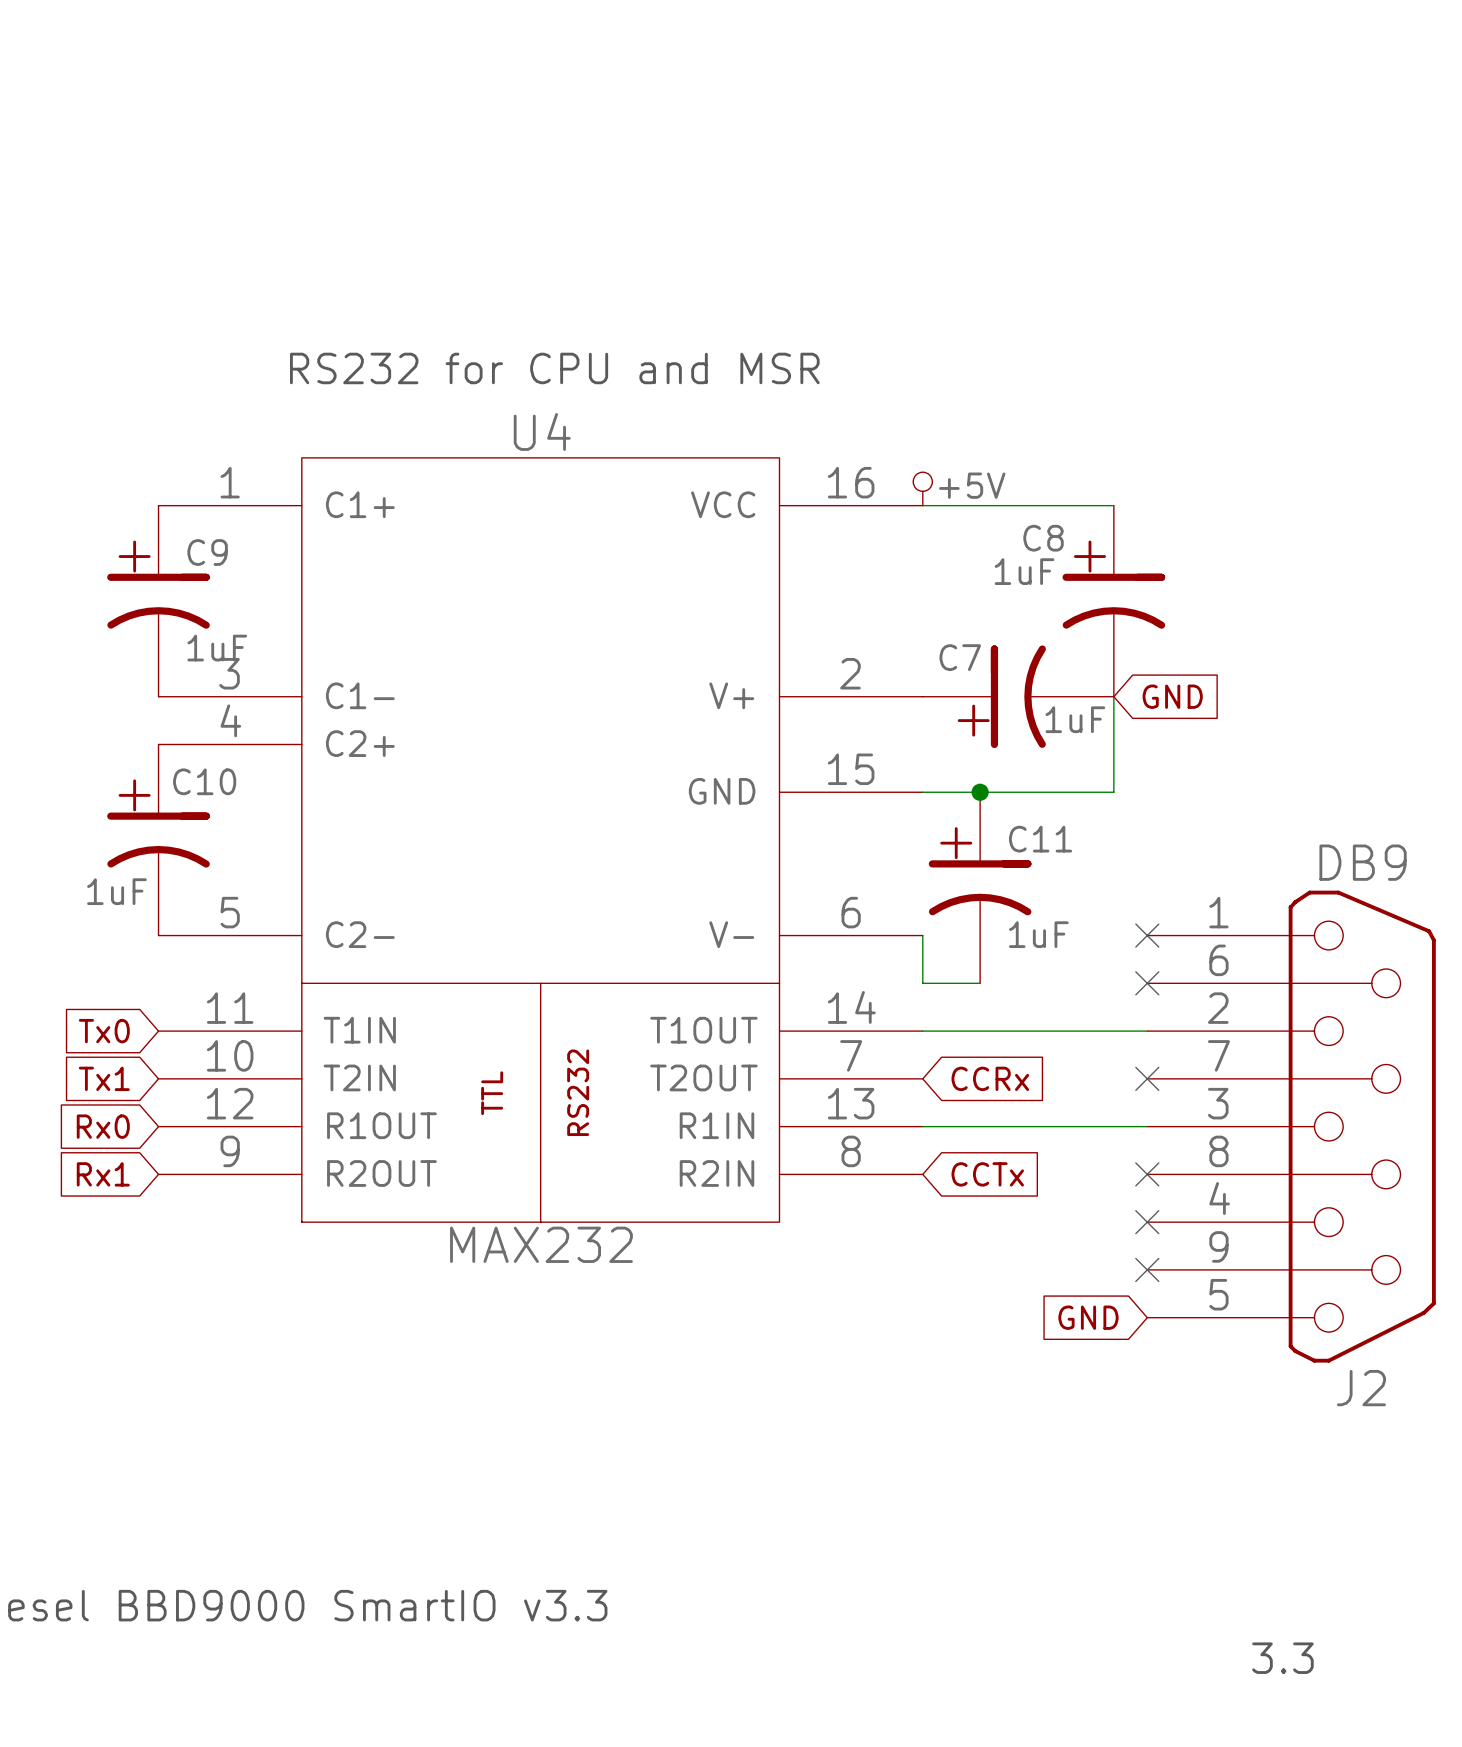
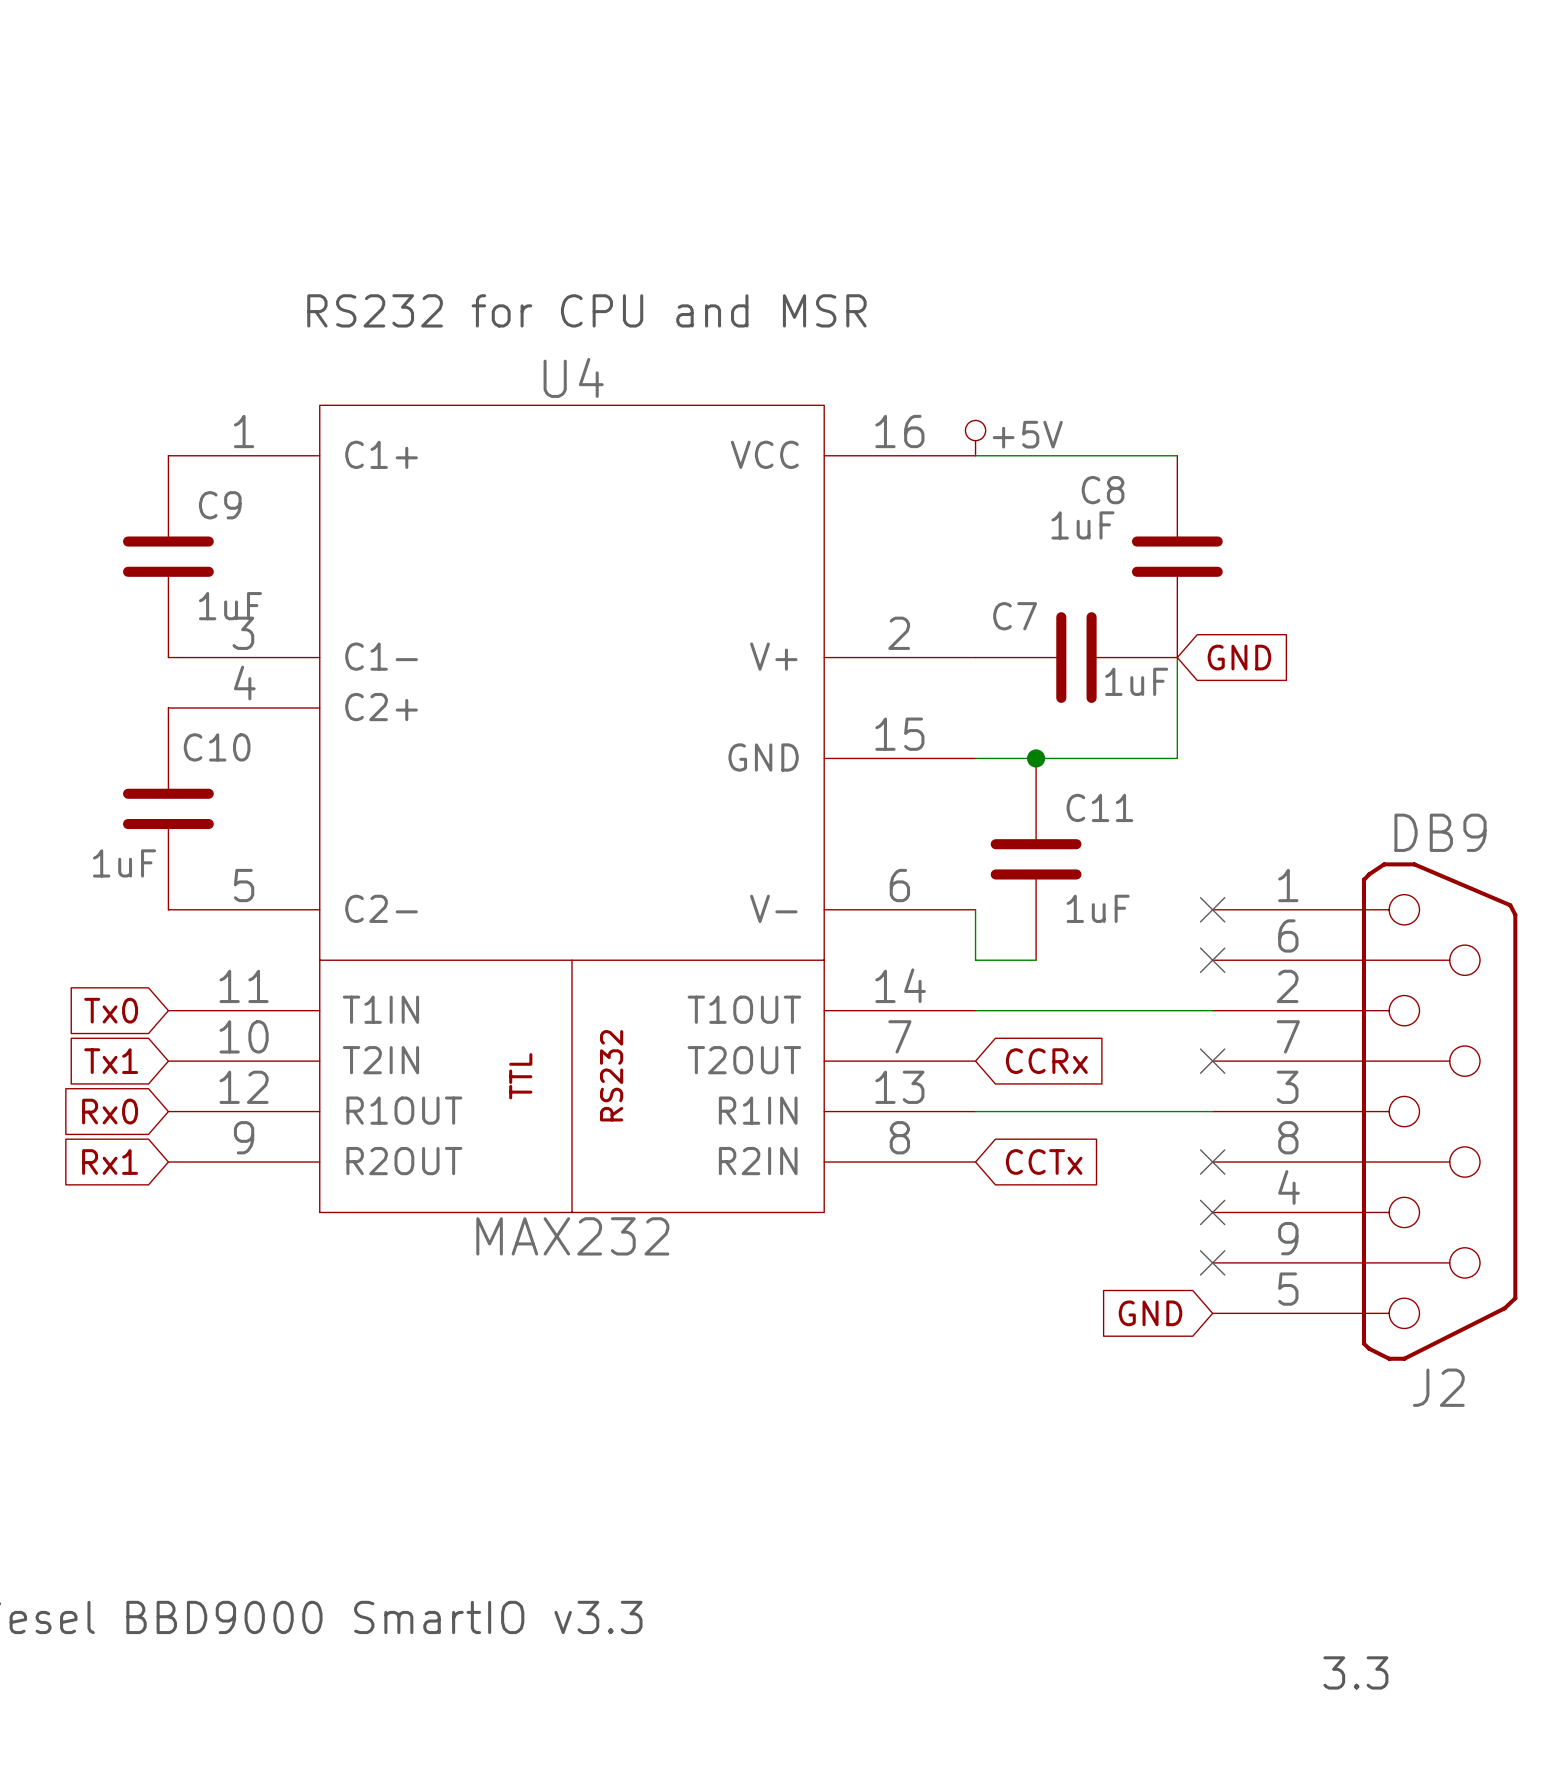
C9 symbol: [107, 505, 210, 697] -> [123, 455, 214, 658]
C8 symbol: [1062, 505, 1166, 697] -> [1131, 455, 1223, 658]
C7 symbol: [922, 645, 1114, 749] -> [975, 612, 1178, 703]
C10 symbol: [107, 744, 210, 936] -> [123, 708, 214, 910]
C11 symbol: [928, 792, 1032, 984] -> [990, 758, 1082, 961]

